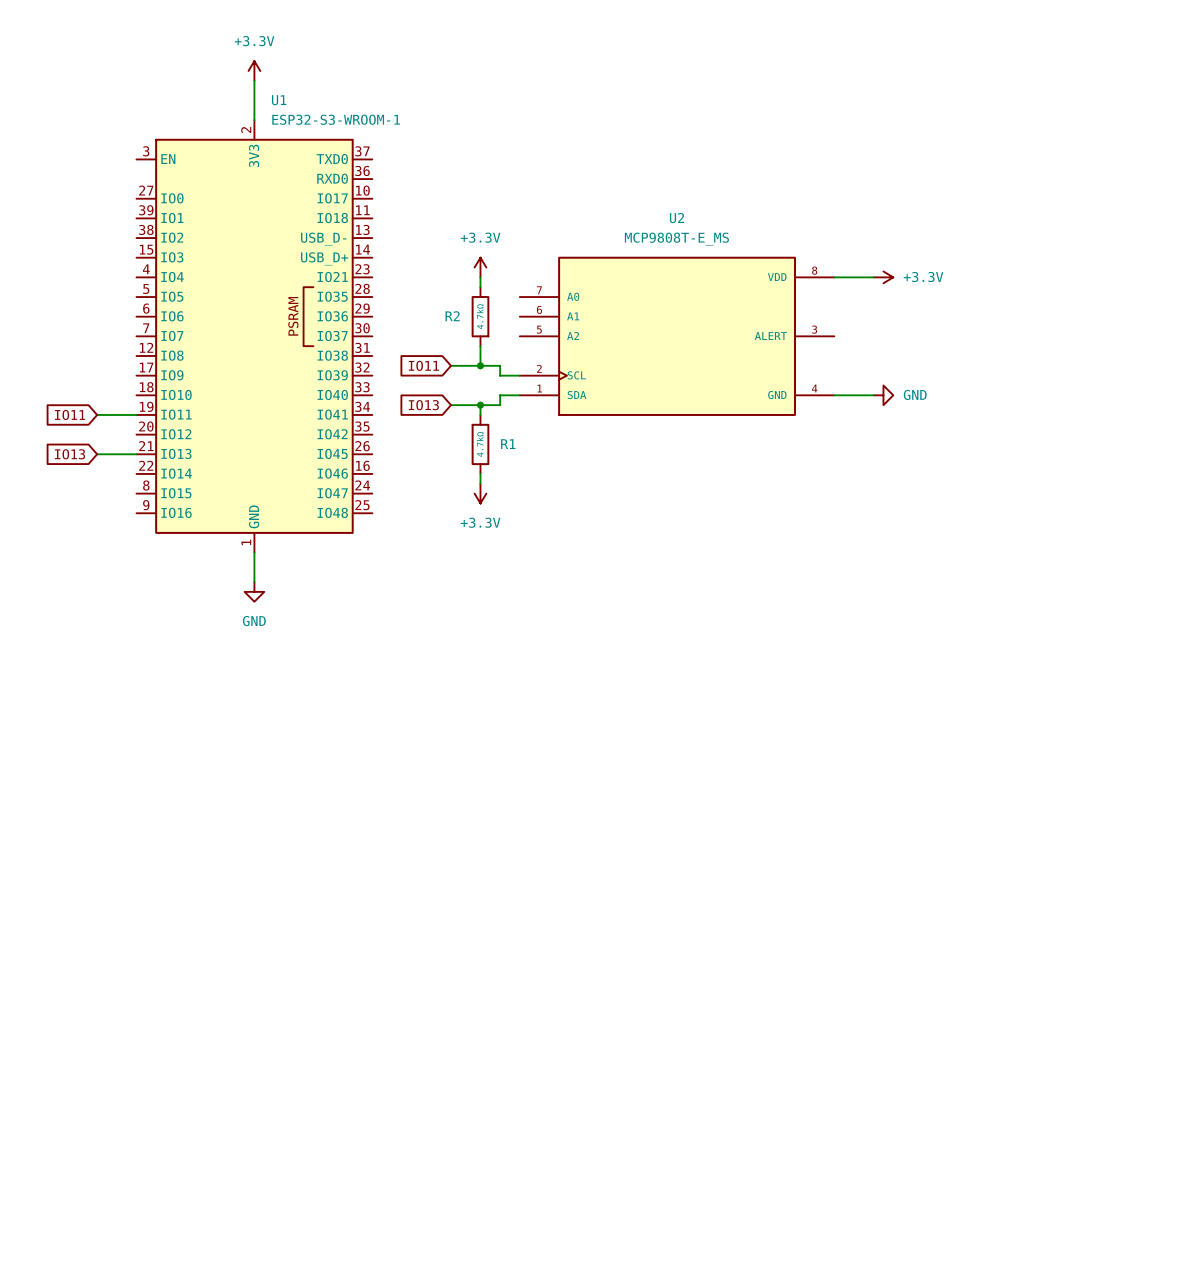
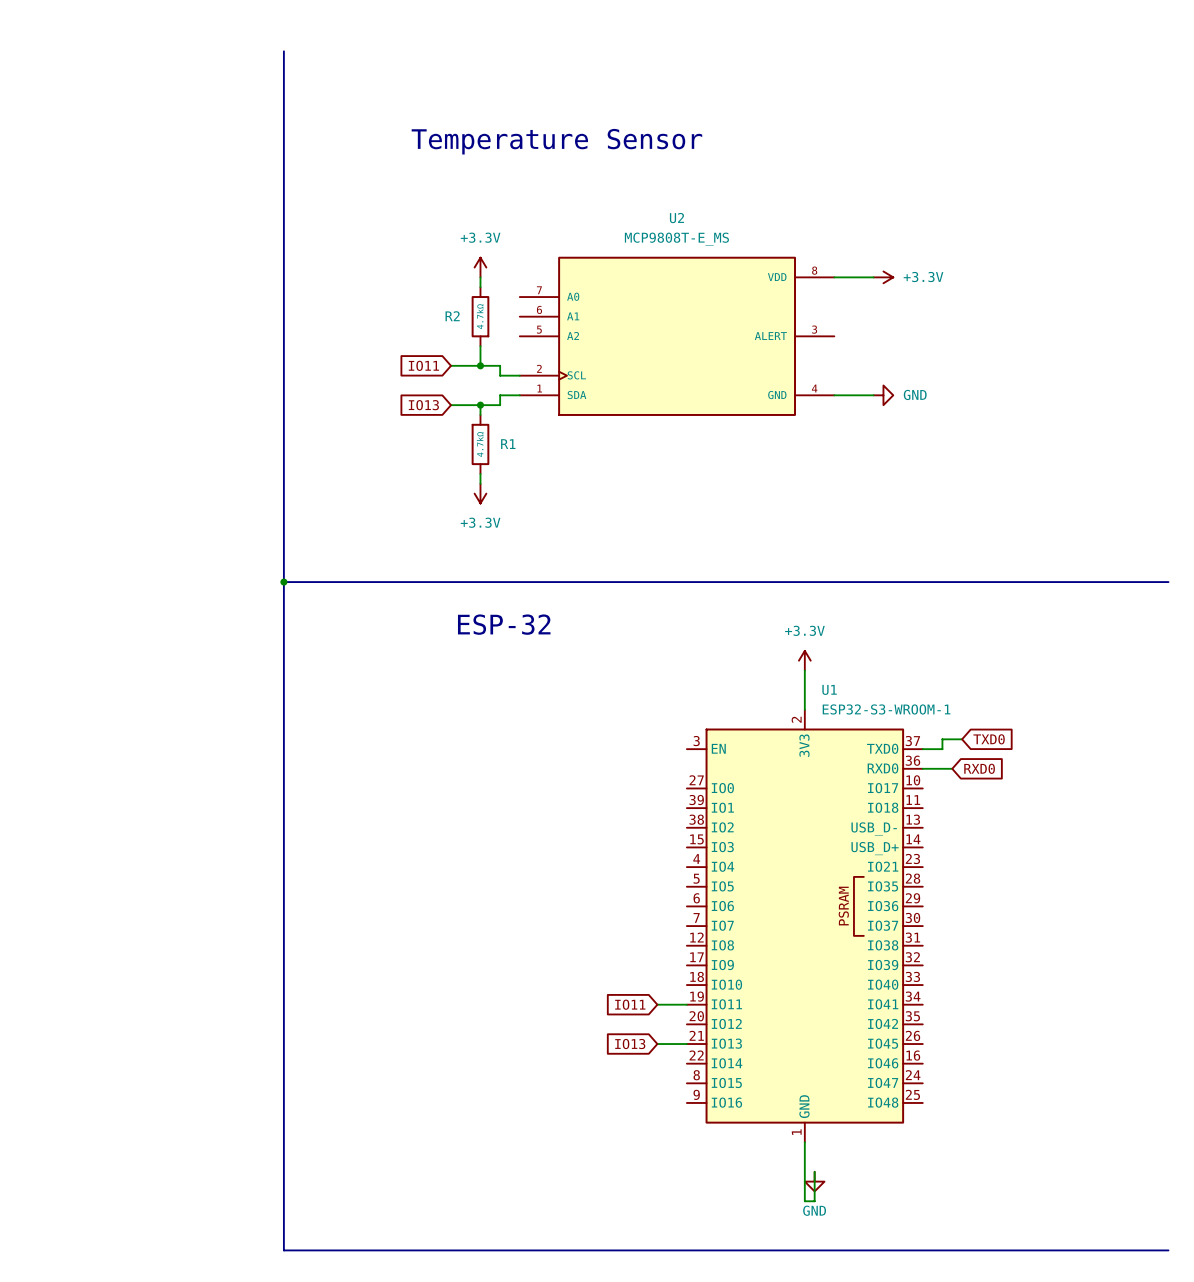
bus: none -> (283, 51) (283, 1250) (1168, 1250)
power symbol: +3.3V (254, 70) -> none
wire: (254, 80) (254, 120) -> none
text: none -> Temperature Sensor (556, 141)
U1 position: (254, 336) -> (804, 926)
global label: IO11 (70, 414) -> none
wire: (97, 414) (136, 414) -> none
global label: IO13 (70, 454) -> none
wire: (97, 454) (136, 454) -> none
wire: (254, 552) (254, 582) -> none
bus: none -> (283, 582) (1168, 582)
junction: none -> (283, 582)
power symbol: GND (254, 591) -> none
text: none -> ESP-32 (504, 624)
power symbol: none -> +3.3V (804, 660)
wire: none -> (804, 670) (804, 709)
wire: none -> (962, 739) (942, 739) (942, 749) (922, 749)
global label: none -> TXD0 (989, 739)
wire: none -> (922, 768) (952, 768)
global label: none -> RXD0 (979, 768)
global label: none -> IO11 (630, 1004)
wire: none -> (657, 1004) (686, 1004)
global label: none -> IO13 (630, 1044)
wire: none -> (657, 1044) (686, 1044)
wire: none -> (804, 1142) (804, 1201) (814, 1201) (814, 1171)
power symbol: none -> GND (814, 1181)

